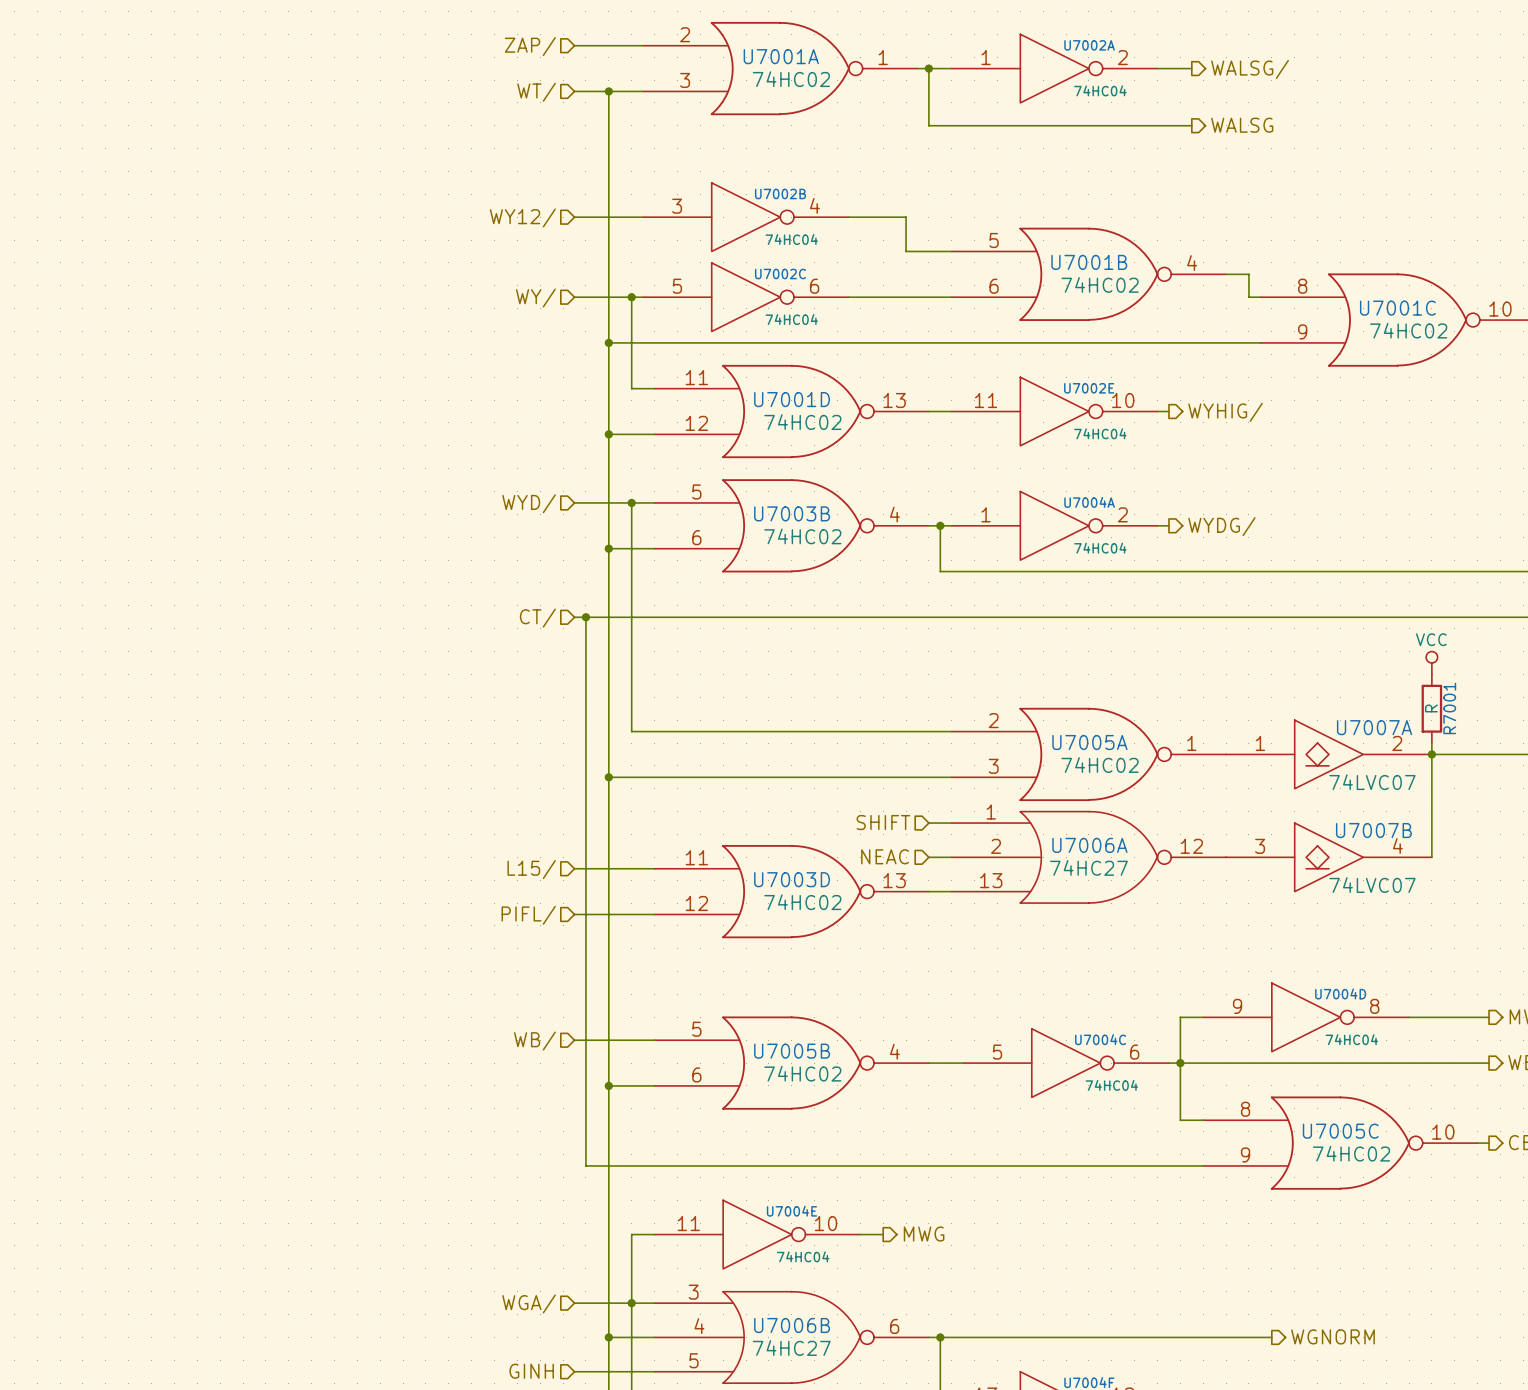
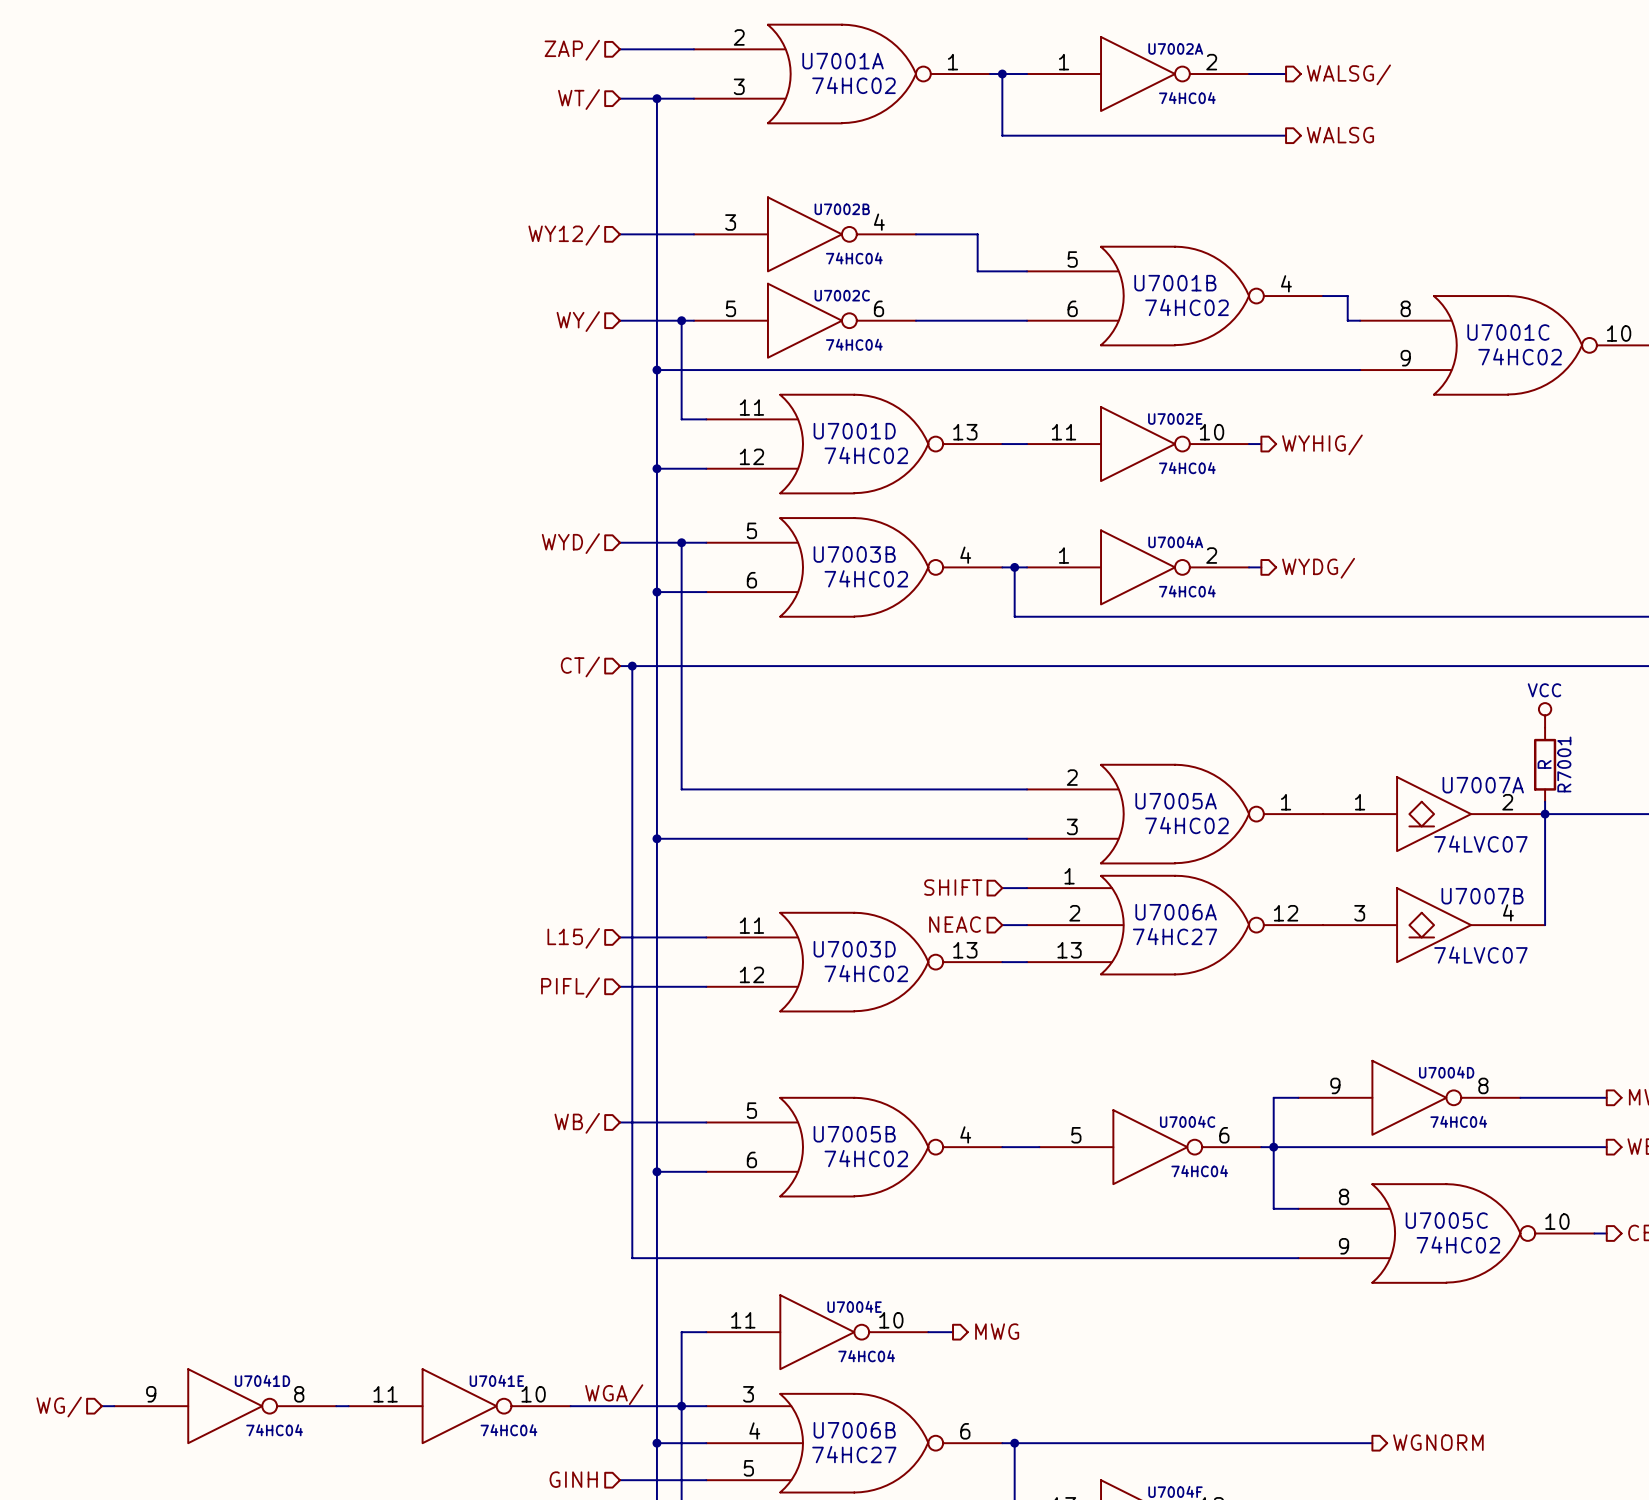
label: none -> WGA/ (614, 1394)
hierarchical label: none -> WG/ (59, 1407)
wire: none -> (101, 1406) (114, 1406)
U7041D: none -> 74HC04 (225, 1406)
wire: none -> (336, 1406) (348, 1406)
U7041E: none -> 74HC04 (459, 1406)
wire: none -> (570, 1406) (619, 1406)
hierarchical label: WGA/ (529, 1303) -> none

